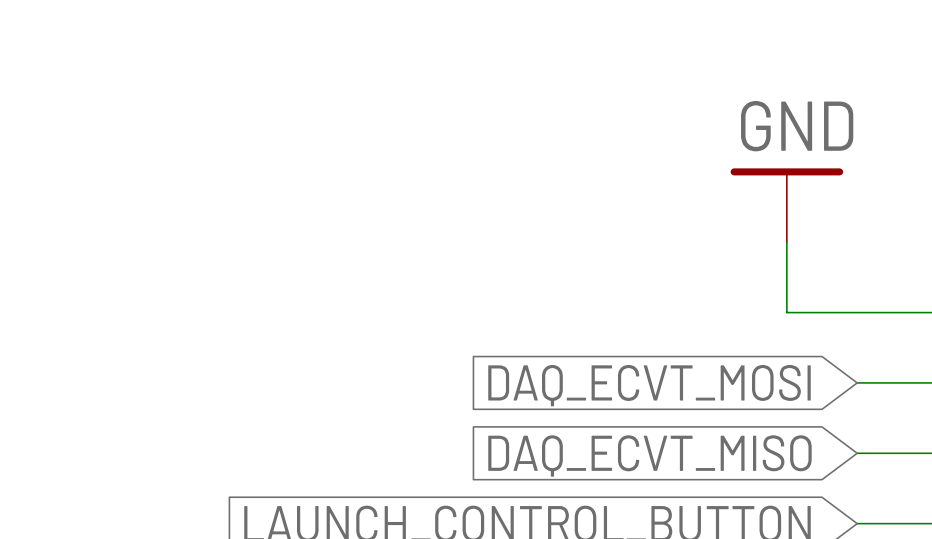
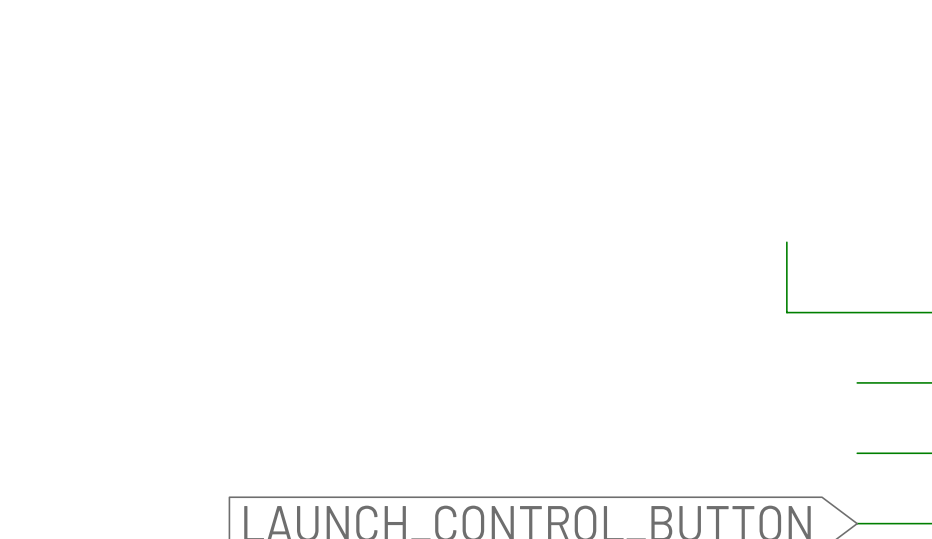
power symbol: GND (786, 205) -> none
global label: DAQ_ECVT_MOSI (649, 385) -> none
global label: DAQ_ECVT_MISO (649, 455) -> none

